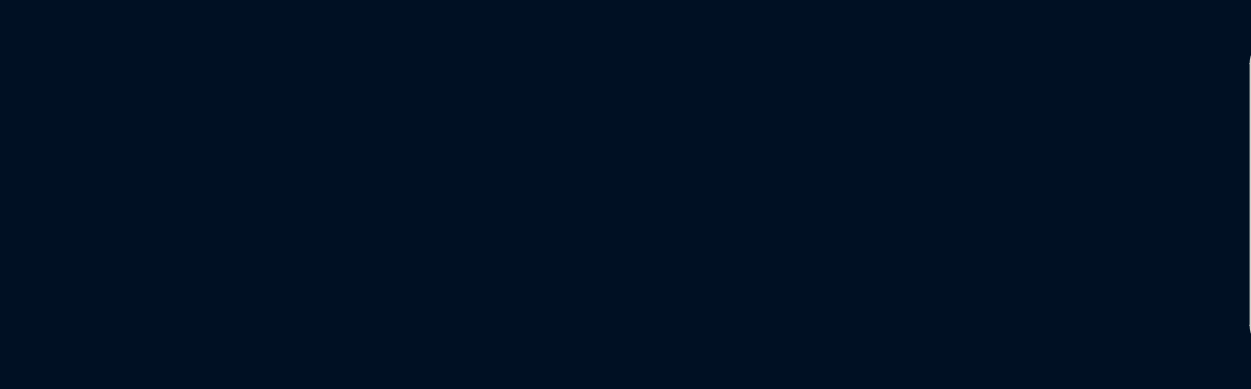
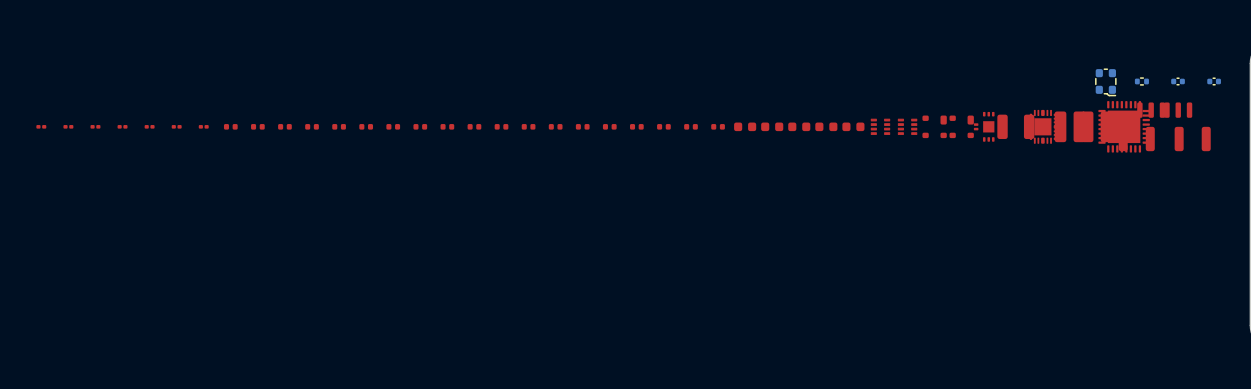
part: none -> (1141, 81)
part: none -> (1178, 81)
part: none -> (1214, 81)
part: none -> (1105, 82)
part: none -> (41, 126)
part: none -> (68, 126)
part: none -> (95, 126)
part: none -> (122, 126)
part: none -> (149, 126)
part: none -> (176, 126)
part: none -> (203, 126)
part: none -> (230, 126)
part: none -> (257, 126)
part: none -> (284, 126)
part: none -> (312, 126)
part: none -> (339, 126)
part: none -> (366, 126)
part: none -> (393, 126)
part: none -> (420, 126)
part: none -> (447, 126)
part: none -> (474, 126)
part: none -> (501, 126)
part: none -> (528, 126)
part: none -> (555, 126)
part: none -> (582, 126)
part: none -> (609, 126)
part: none -> (636, 126)
part: none -> (663, 126)
part: none -> (691, 126)
part: none -> (718, 126)
part: none -> (745, 126)
part: none -> (772, 126)
part: none -> (799, 126)
part: none -> (826, 126)
part: none -> (853, 126)
part: none -> (880, 126)
part: none -> (907, 126)
part: none -> (934, 126)
part: none -> (961, 126)
part: none -> (988, 126)
part: none -> (1015, 126)
part: none -> (1042, 126)
part: none -> (1069, 126)
part: none -> (1097, 126)
part: none -> (1124, 126)
part: none -> (1151, 126)
part: none -> (1178, 126)

